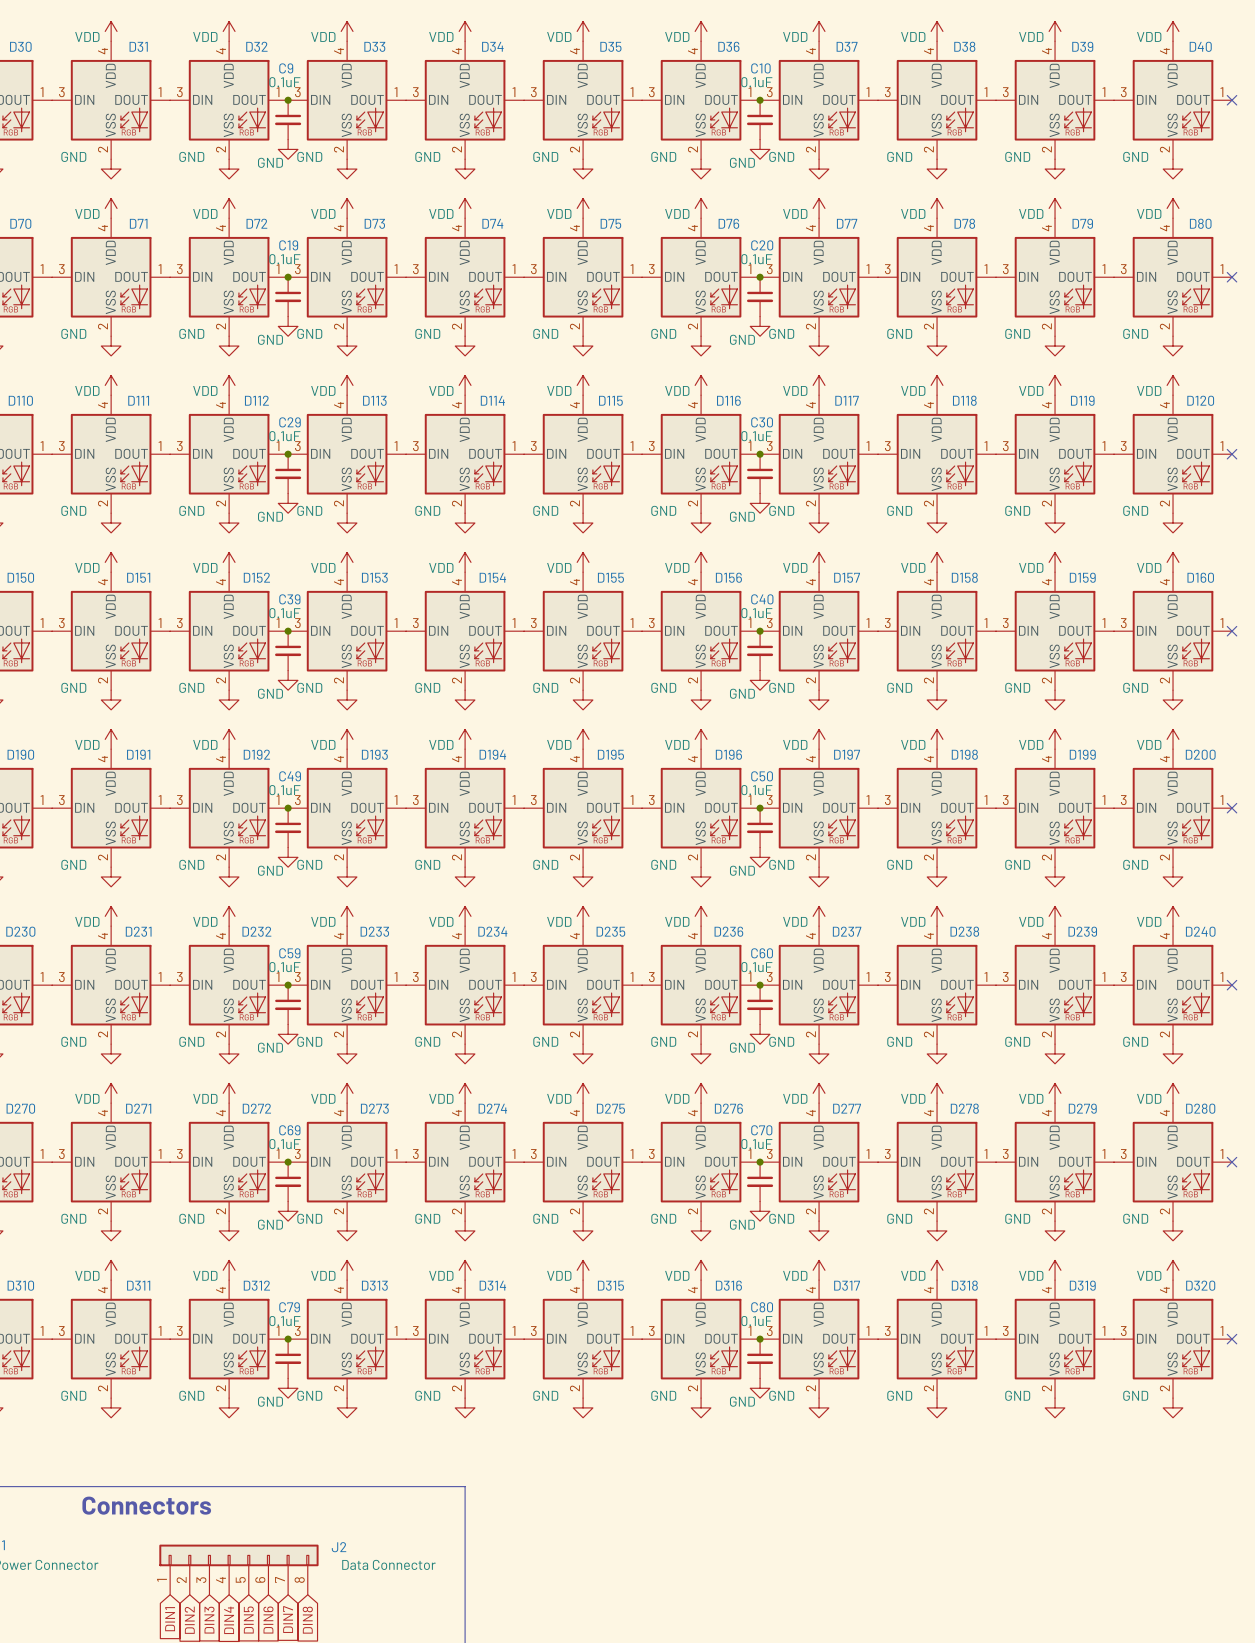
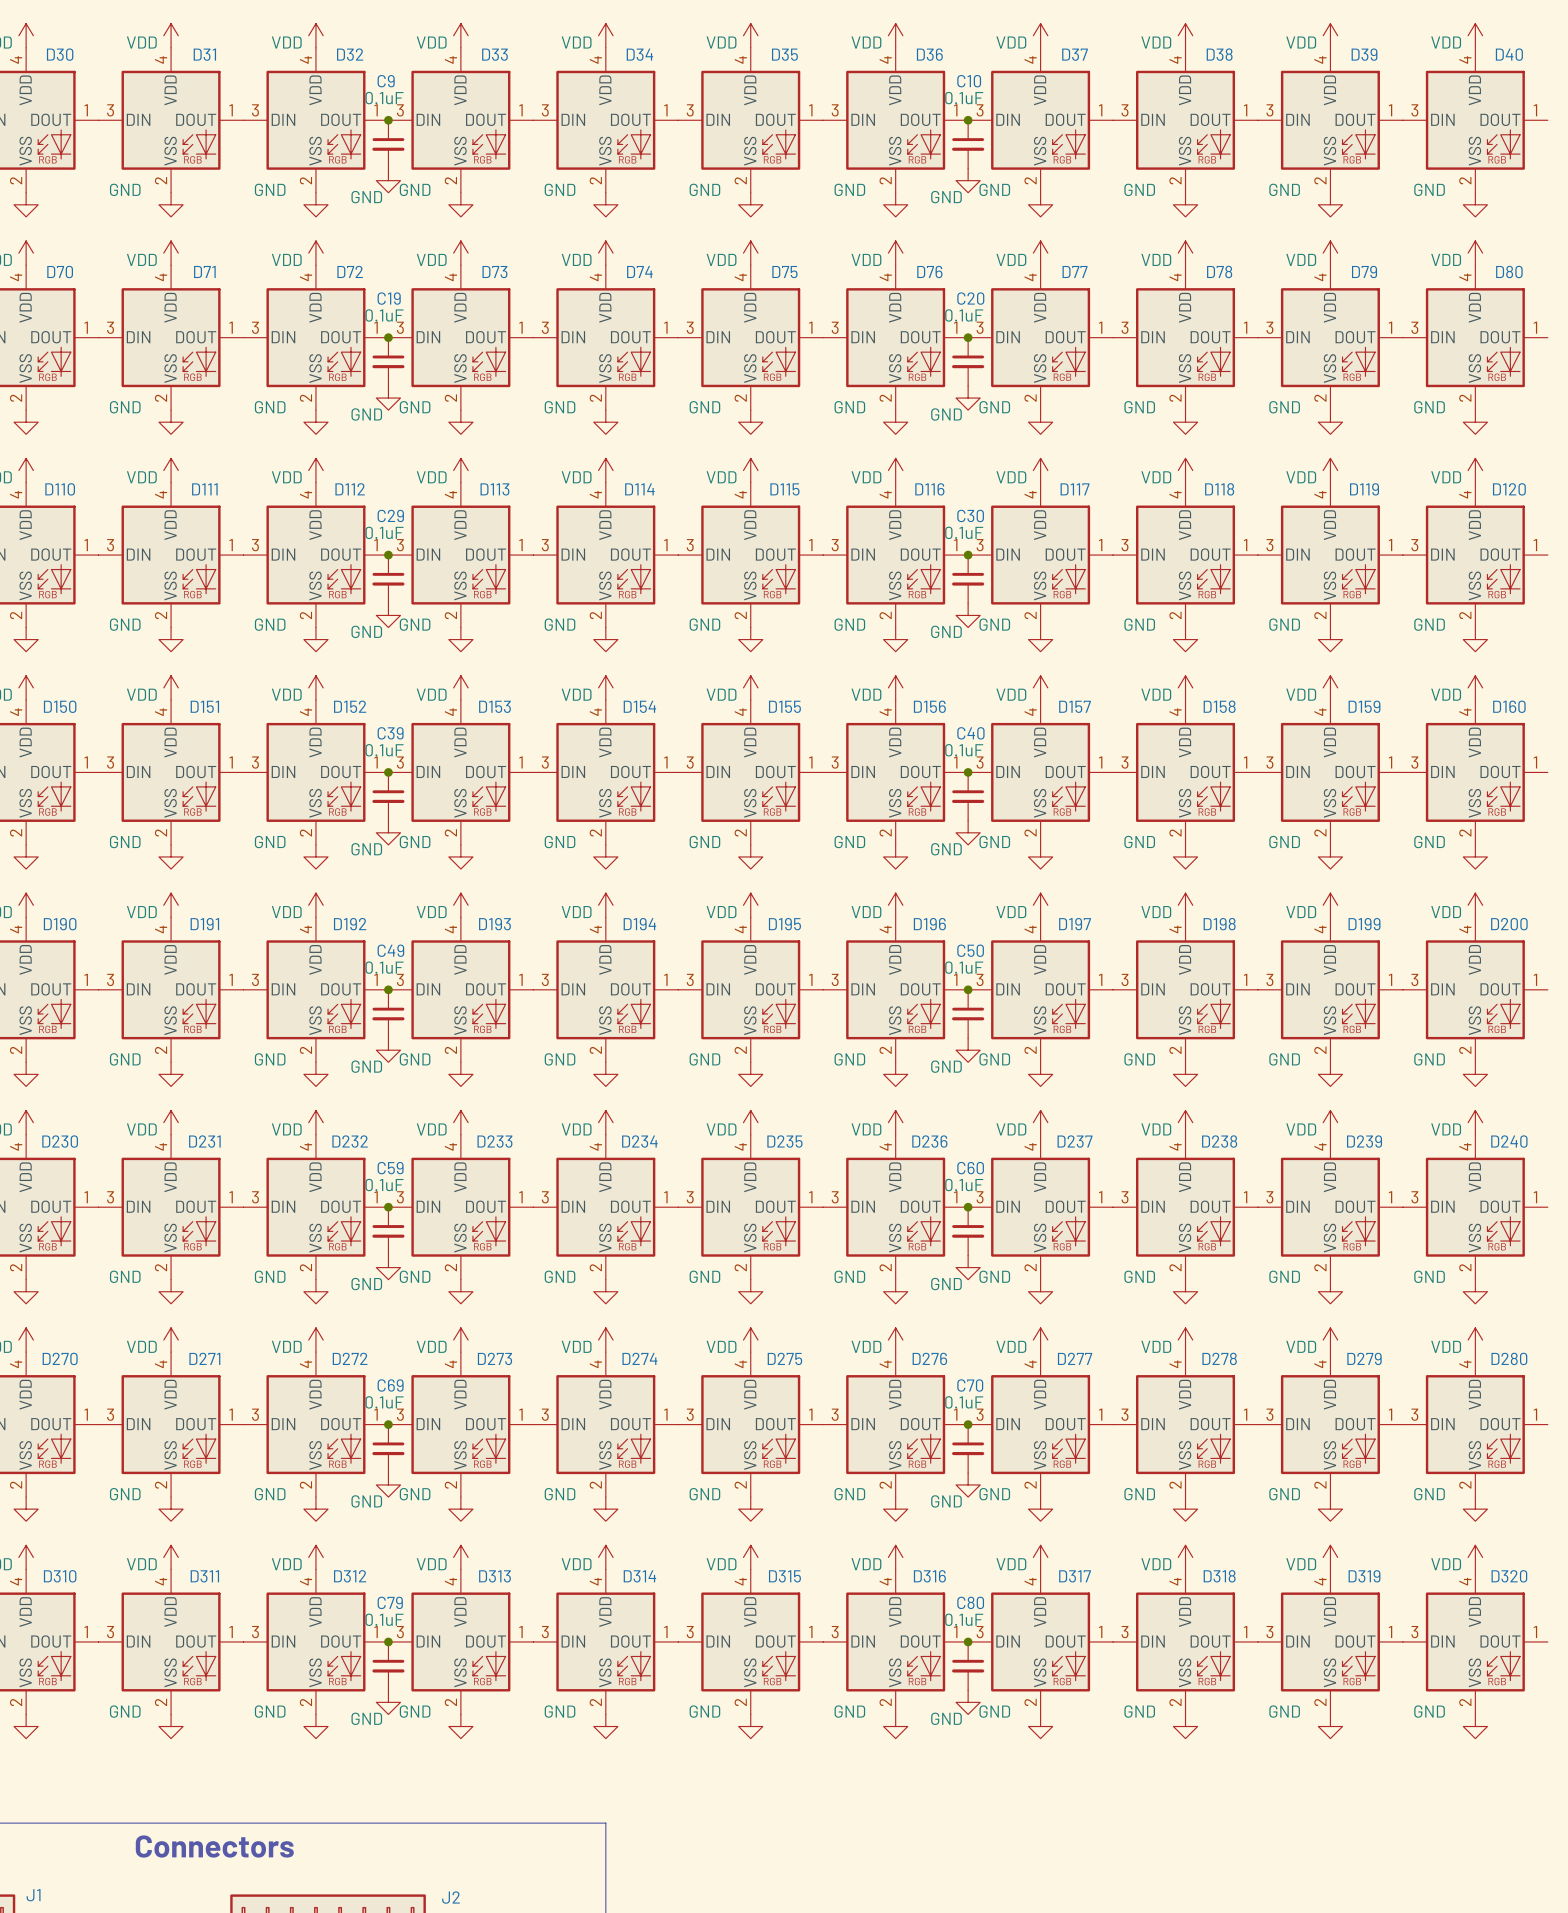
no-connect mark: (1232, 100) -> none
no-connect mark: (1232, 277) -> none
no-connect mark: (1232, 454) -> none
no-connect mark: (1232, 631) -> none
no-connect mark: (1232, 808) -> none
no-connect mark: (1232, 985) -> none
no-connect mark: (1232, 1162) -> none
no-connect mark: (1232, 1339) -> none

